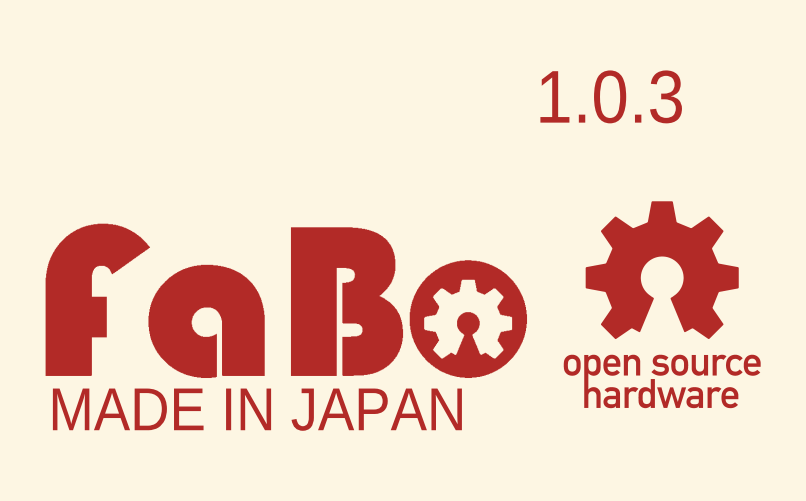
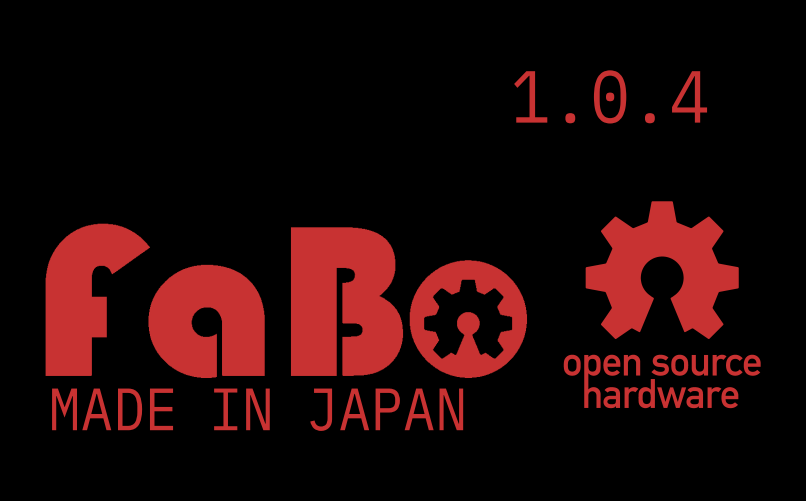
text: 1.0.3 (611, 96) -> 1.0.4 (610, 96)

